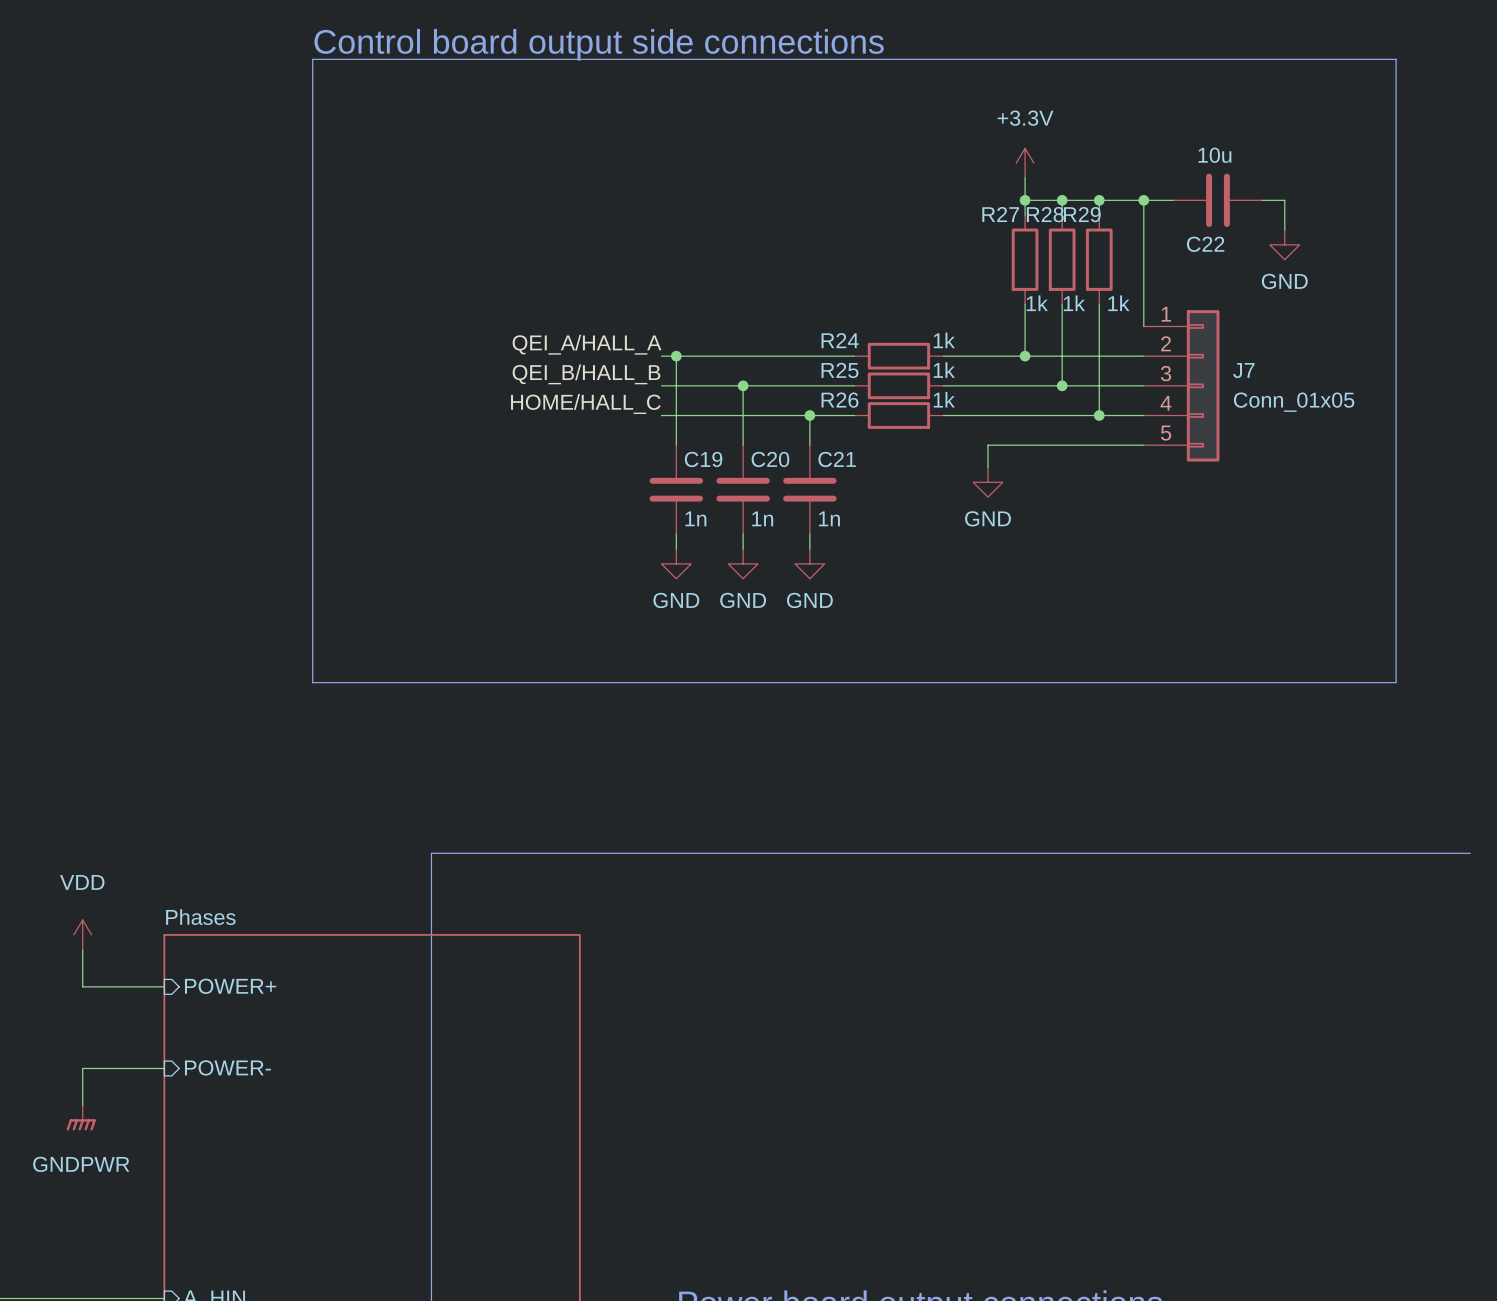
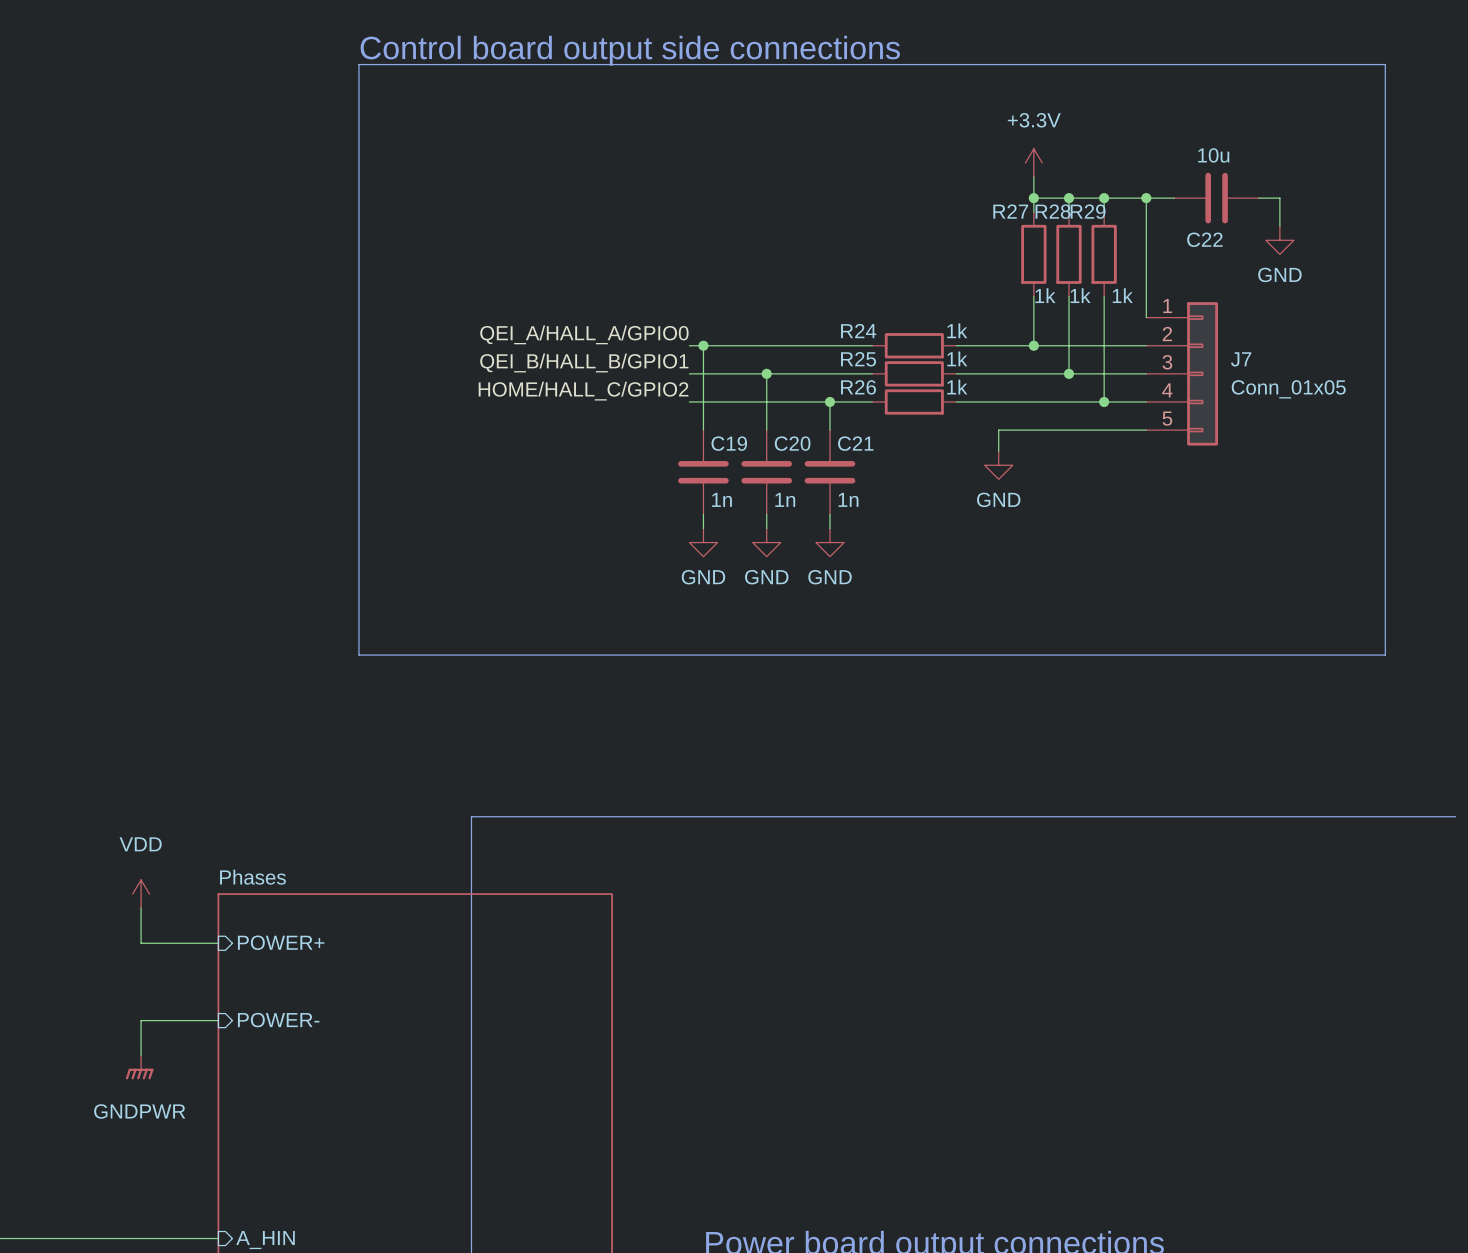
label: QEI_A/HALL_A (587, 344) -> QEI_A/HALL_A/GPIO0 (584, 334)
label: QEI_B/HALL_B (586, 374) -> QEI_B/HALL_B/GPIO1 (584, 362)
label: HOME/HALL_C (585, 404) -> HOME/HALL_C/GPIO2 (583, 391)

